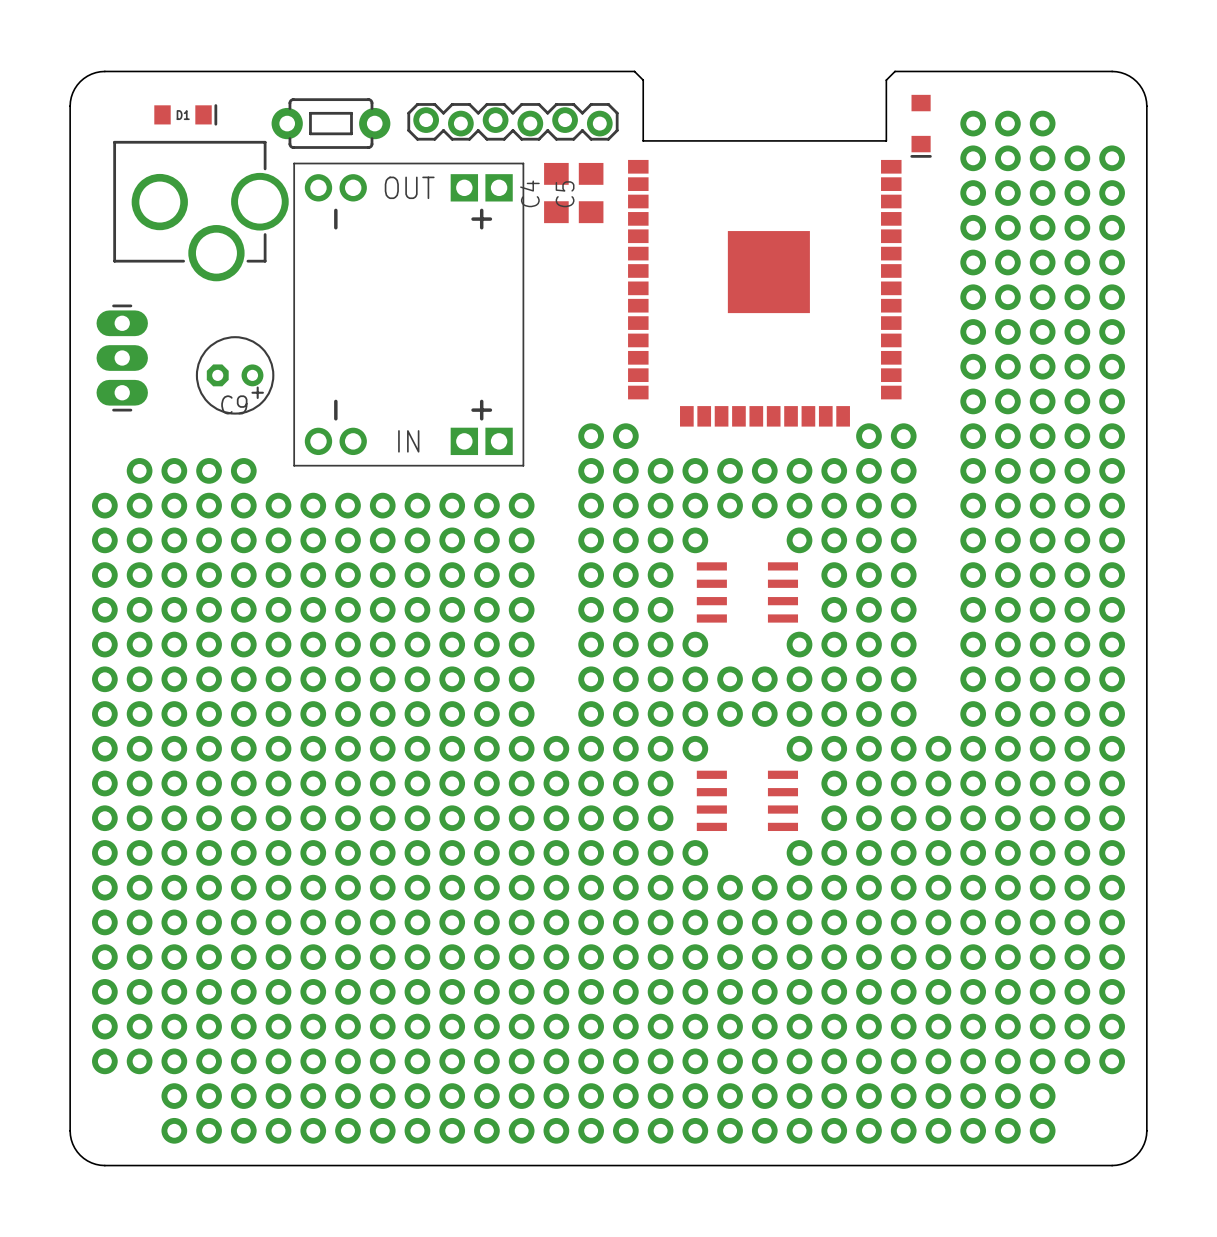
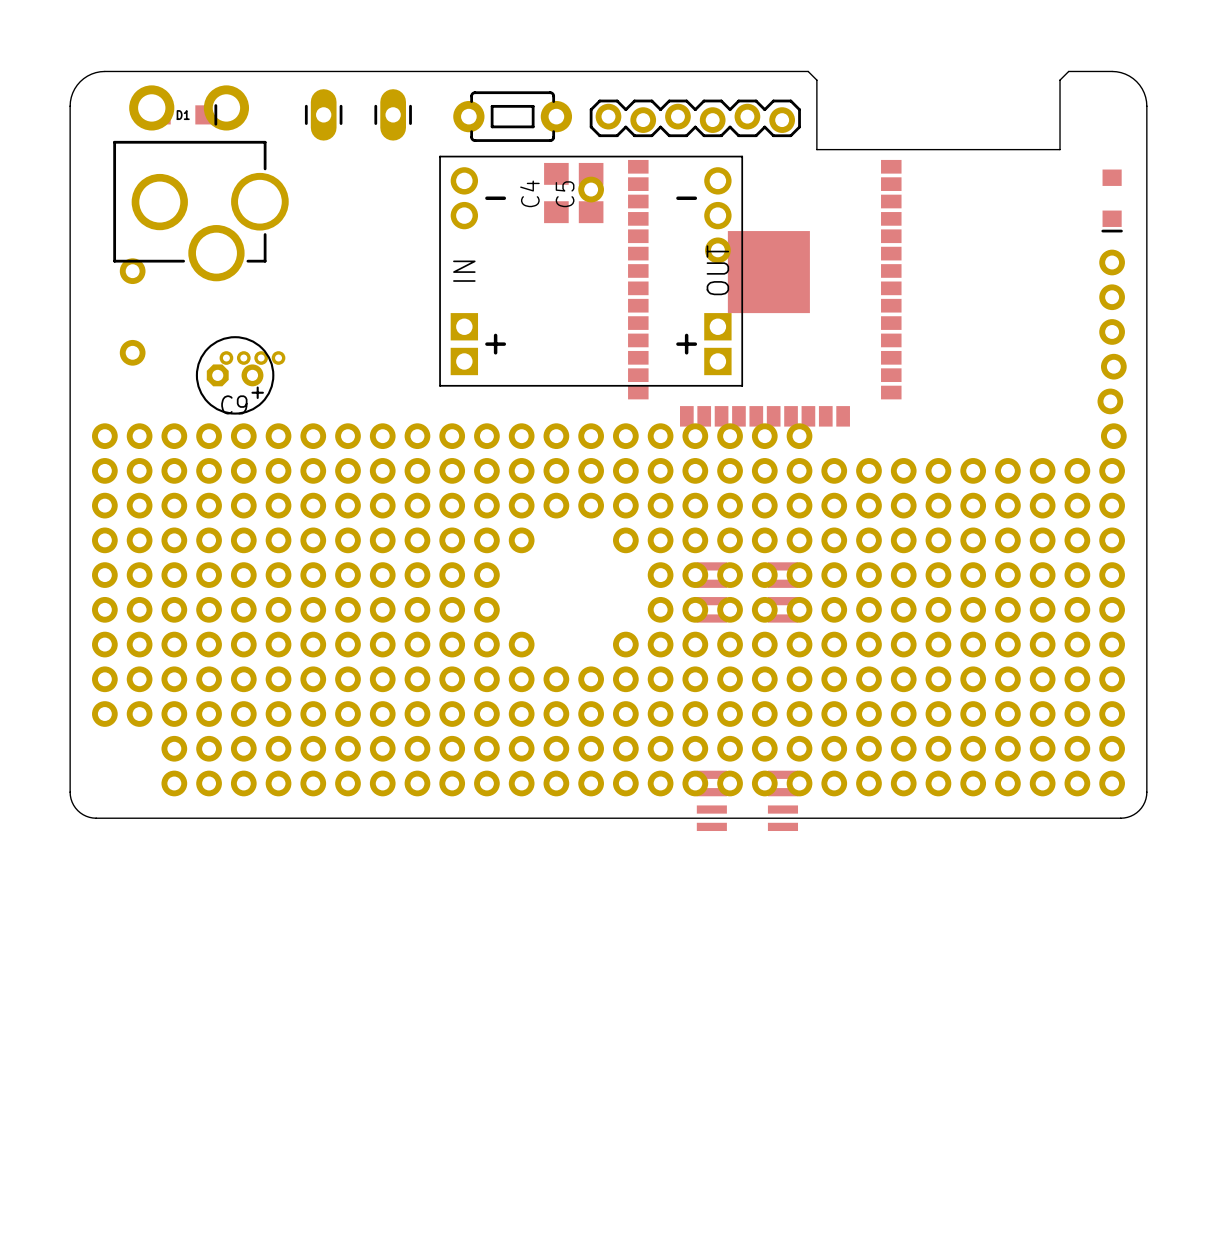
board edge: (634, 71) (643, 80) (643, 140) (886, 140) (886, 80) (895, 71) (1068, 71) -> (634, 71) (808, 71) (816, 80) (816, 149) (1060, 149) (1060, 80) (1068, 71)
part footprint: [271, 98, 391, 149] -> [304, 89, 343, 141]
part footprint: [407, 103, 619, 141] -> [453, 91, 573, 142]
part: none -> (151, 107)
part: none -> (226, 107)
part: none -> (393, 114)
part: none -> (695, 118)
part position: (921, 126) -> (1112, 200)
part footprint: [1099, 145, 1125, 380] -> [1099, 249, 1125, 276]
part: none -> (591, 189)
part: (973, 227) -> none
part: none -> (717, 250)
part: (1077, 262) -> none
part: none -> (132, 271)
part: none -> (591, 271)
part: (1042, 279) -> none
part side: top (1007, 297) -> bottom (938, 470)
part footprint: [96, 304, 148, 412] -> [119, 339, 146, 366]
part: (408, 314) -> none
part: none -> (252, 358)
part footprint: [1064, 388, 1091, 1075] -> [1064, 666, 1091, 797]
part: none -> (1112, 401)
part: (973, 418) -> none
part: none -> (122, 436)
part: none -> (400, 436)
part: none -> (730, 436)
part: (886, 436) -> none
part: none -> (174, 453)
part: none -> (122, 470)
part: none -> (400, 470)
part: none -> (382, 505)
part: none -> (886, 505)
part: none -> (886, 540)
part: none -> (886, 575)
part: none -> (886, 609)
part: none -> (886, 644)
part: none -> (365, 679)
part: none -> (851, 679)
part: (486, 696) -> none
part: (521, 696) -> none
part: (973, 696) -> none
part: (1007, 696) -> none
part: none -> (365, 714)
part: none -> (851, 714)
part: (1112, 731) -> none
part: none -> (851, 748)
part: (104, 783) -> none
part: none -> (851, 783)
board edge: (70, 792) (70, 1135) (72, 1144) (80, 1155) (91, 1162) (104, 1165) (1112, 1165) (1125, 1162) (1139, 1151) (1145, 1139) (1146, 1130) (1146, 792) -> (70, 792) (72, 802) (77, 810) (86, 816) (96, 818) (1120, 818) (1130, 816) (1139, 810) (1144, 802) (1146, 792)
part: (139, 800) -> none
part: (174, 800) -> none
part: (660, 800) -> none
part: (834, 800) -> none
part: (1042, 800) -> none
part: (591, 818) -> none
part: (903, 818) -> none
part: (209, 835) -> none
part: (243, 835) -> none
part: (278, 835) -> none
part: (313, 835) -> none
part: (347, 835) -> none
part: (382, 835) -> none
part: (417, 835) -> none
part: (452, 835) -> none
part: (625, 835) -> none
part: (868, 835) -> none
part: (695, 852) -> none
part: (799, 852) -> none
part: (747, 905) -> none
part: (556, 939) -> none
part: (938, 939) -> none
part: (747, 974) -> none
part: (486, 1026) -> none
part: (521, 1026) -> none
part: (973, 1026) -> none
part: (1007, 1026) -> none
part: (747, 1043) -> none
part: (174, 1113) -> none
part: (747, 1113) -> none

